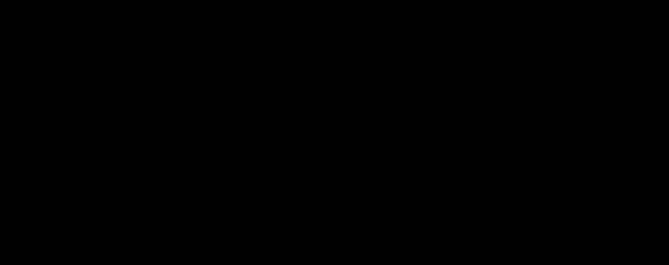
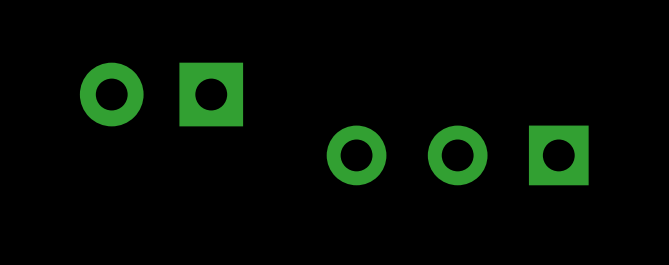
part: none -> (161, 94)
part: none -> (457, 155)

